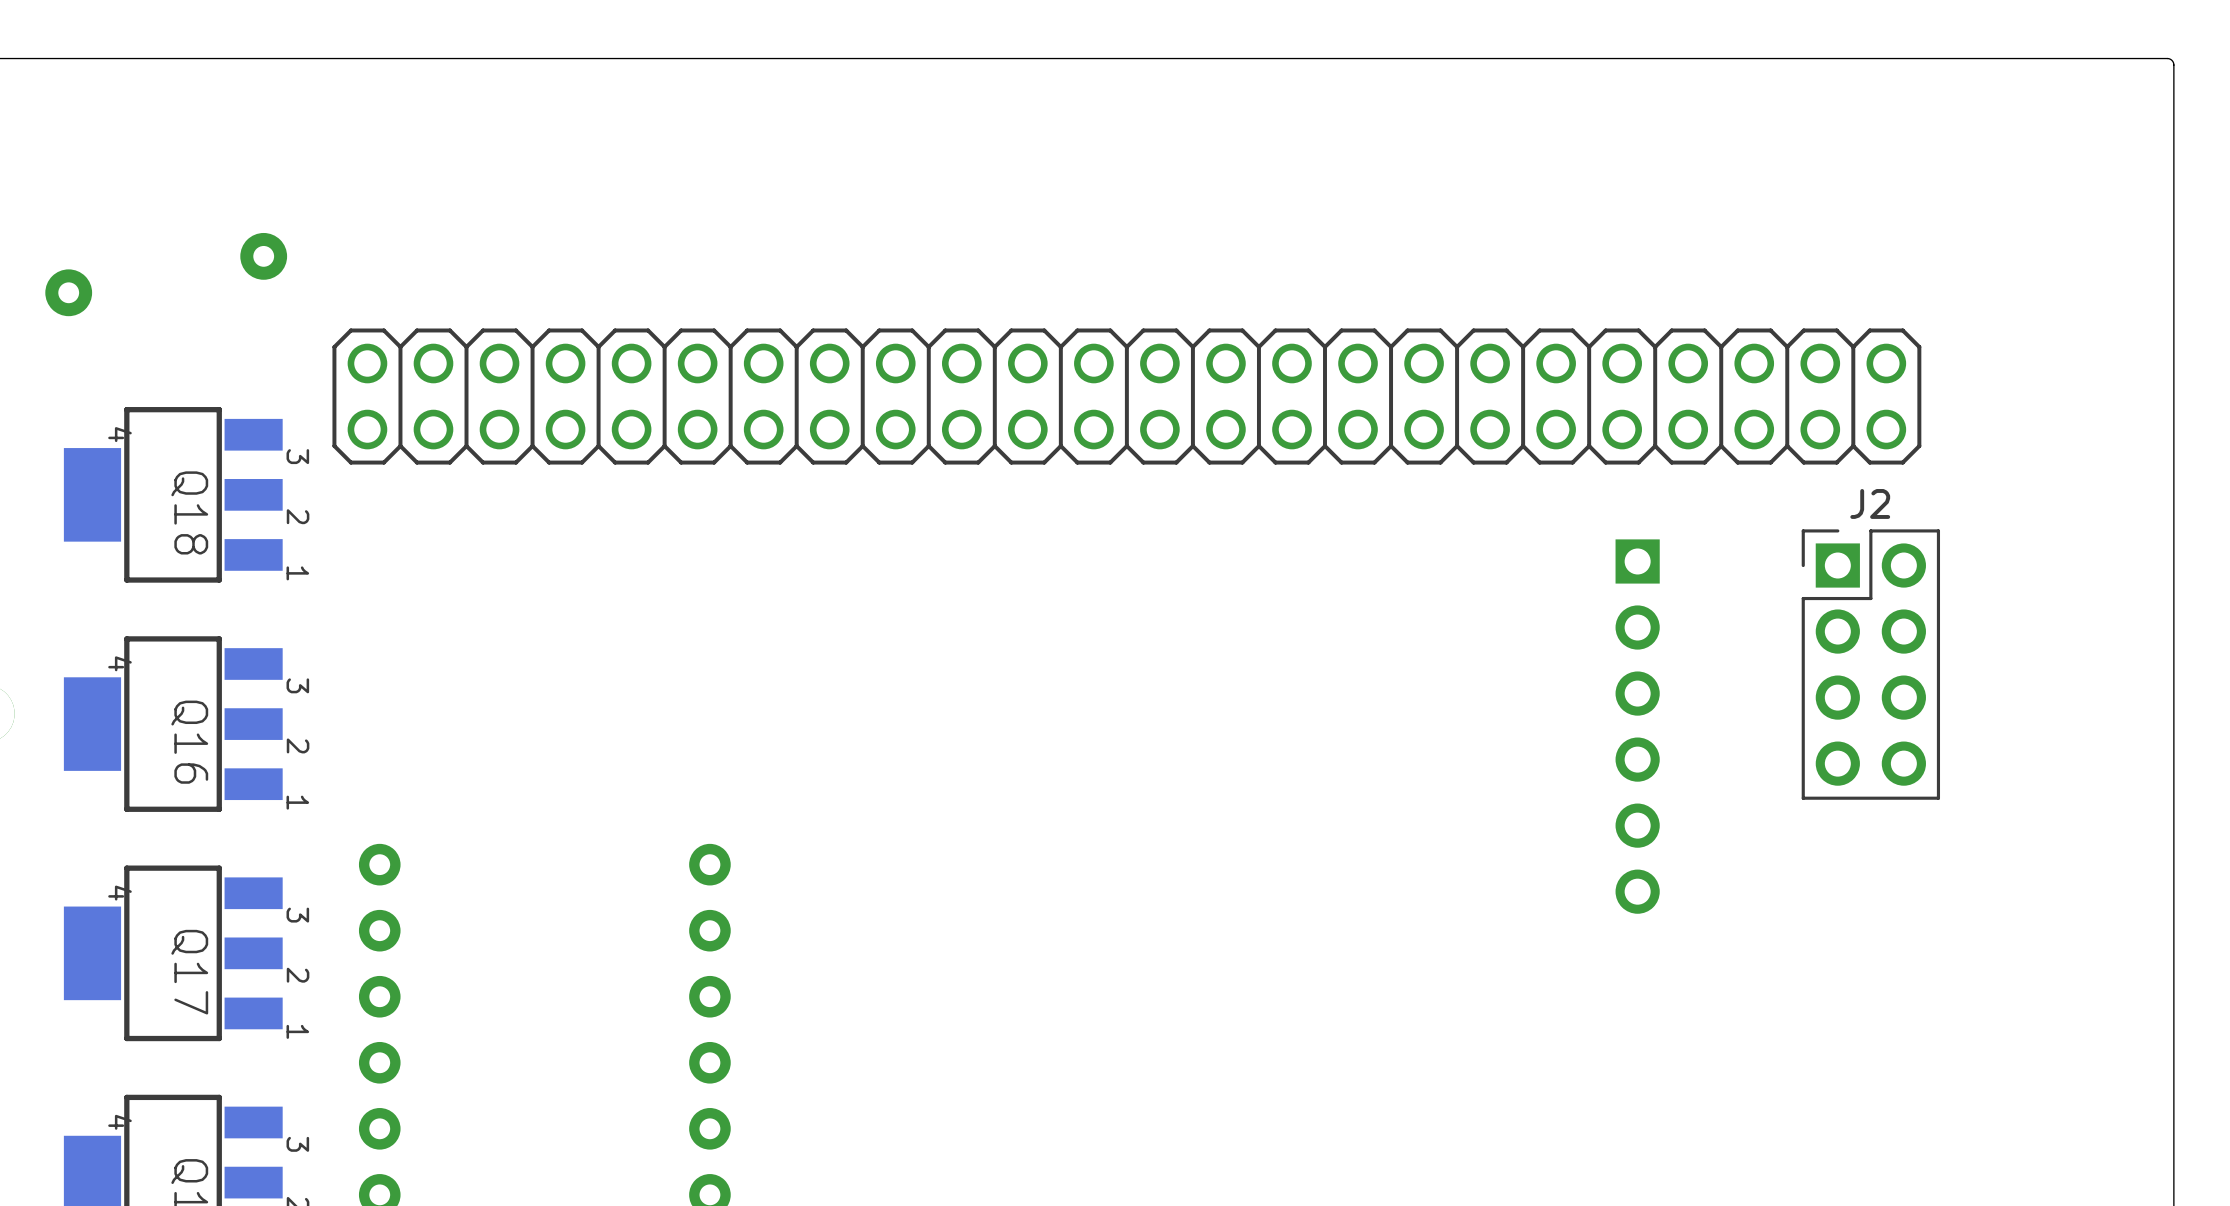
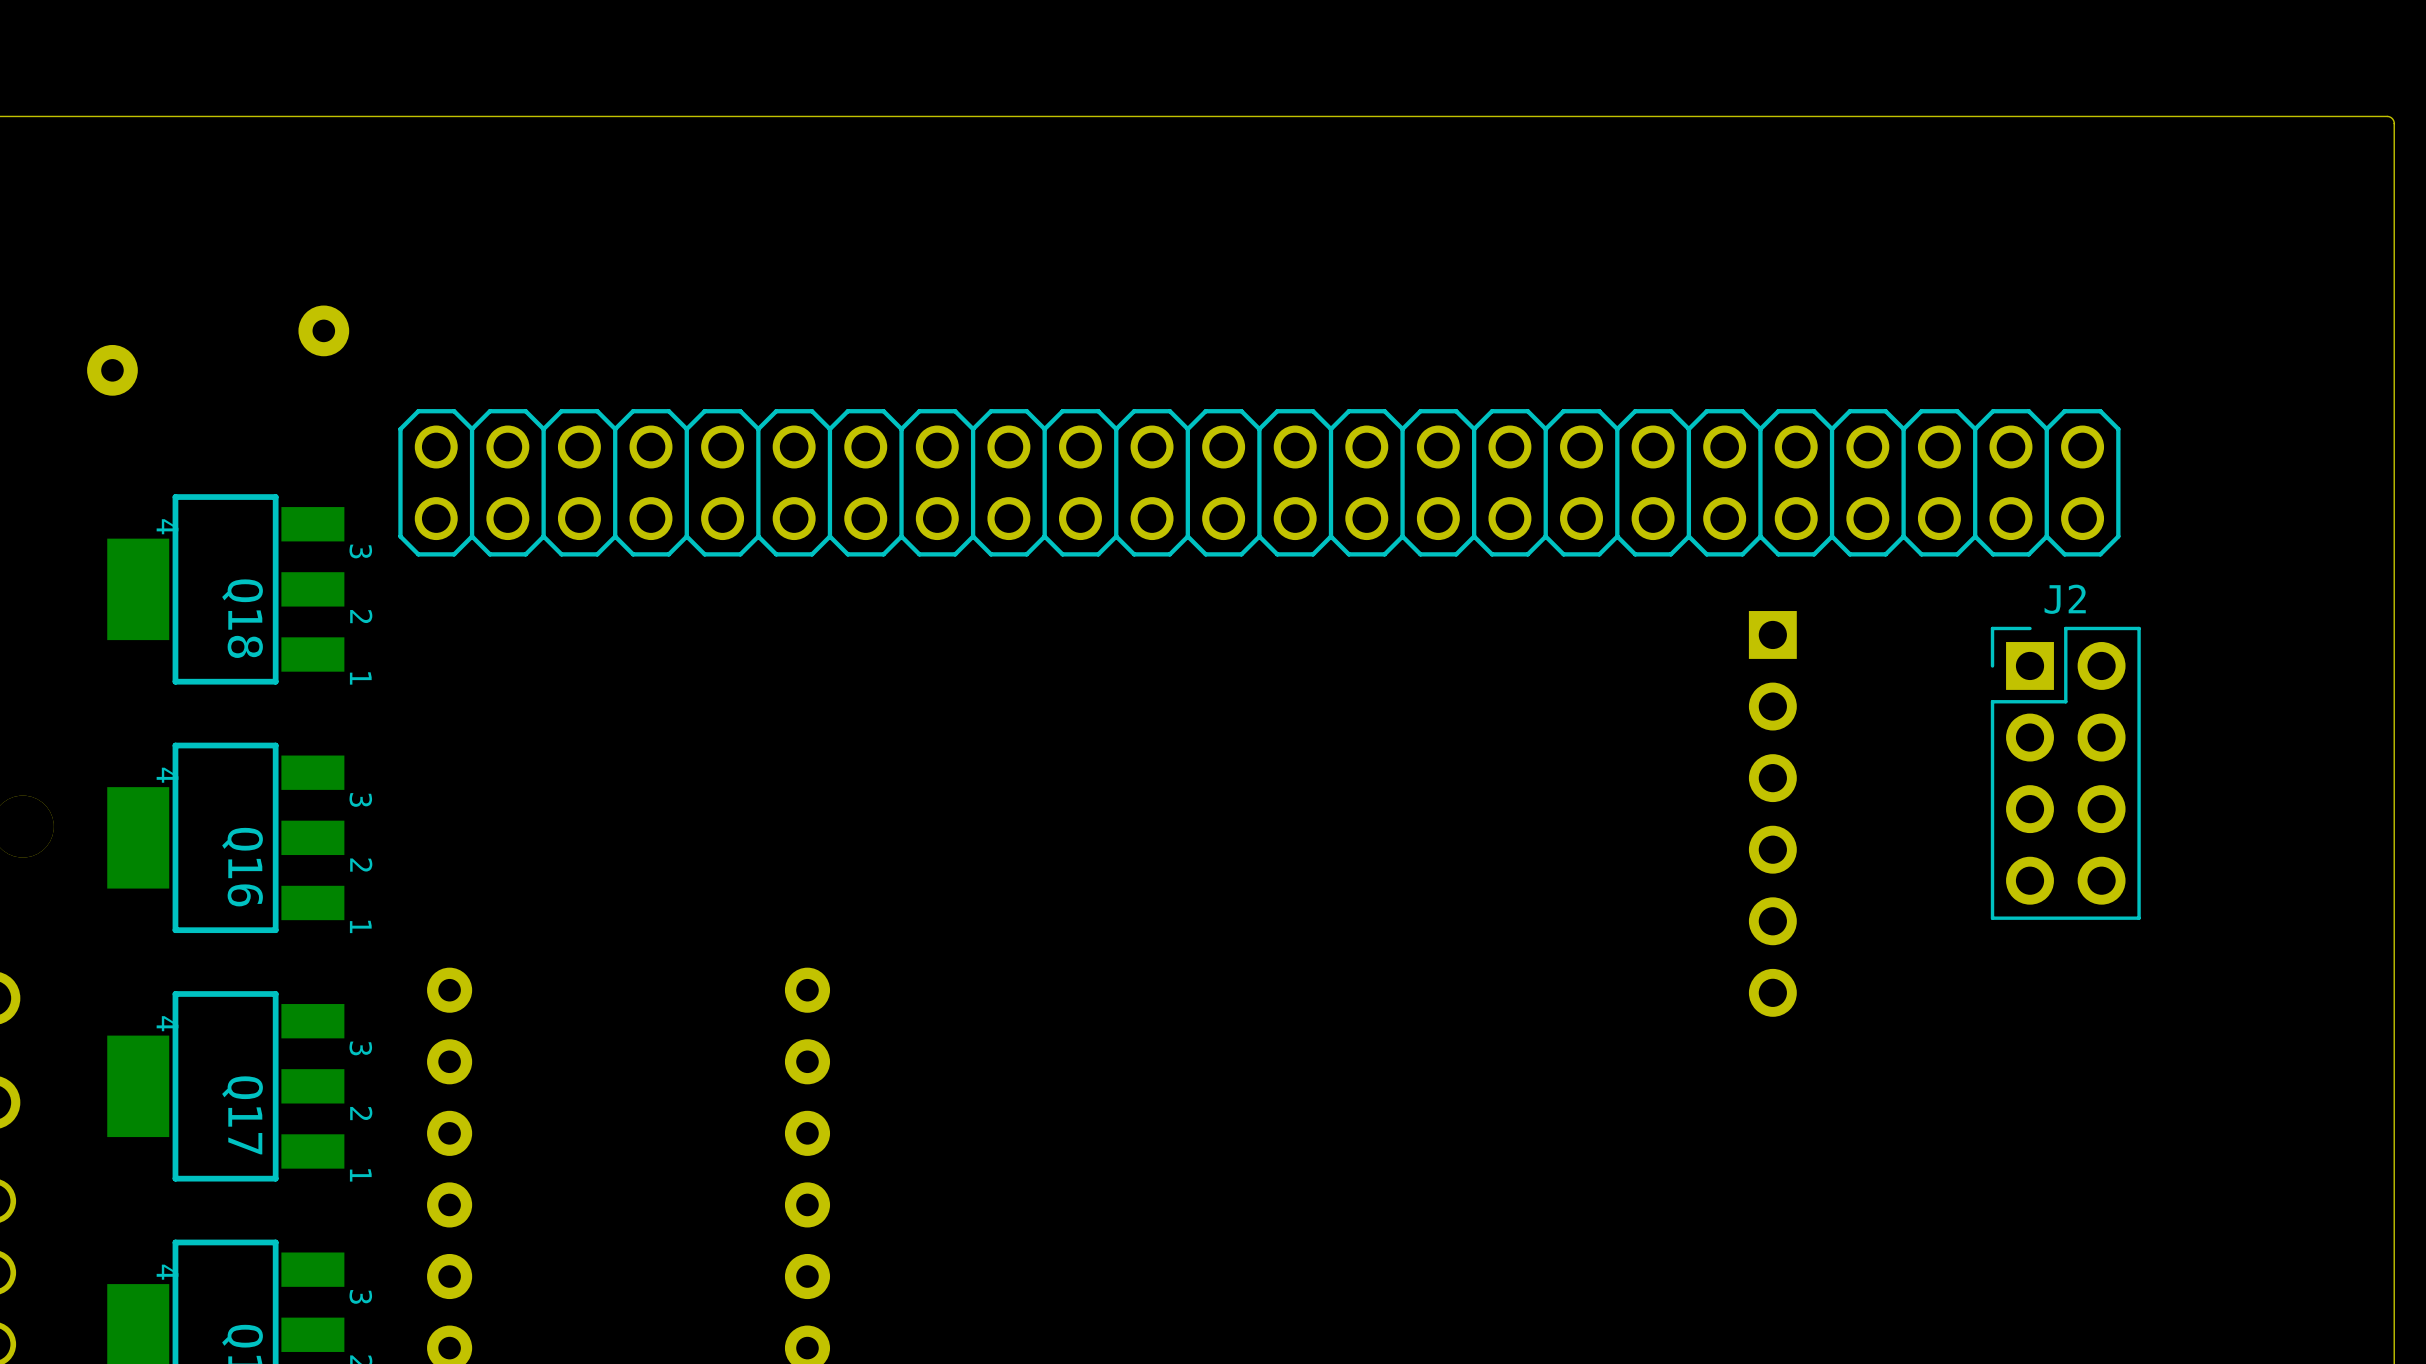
part position: (1637, 726) -> (1772, 813)

